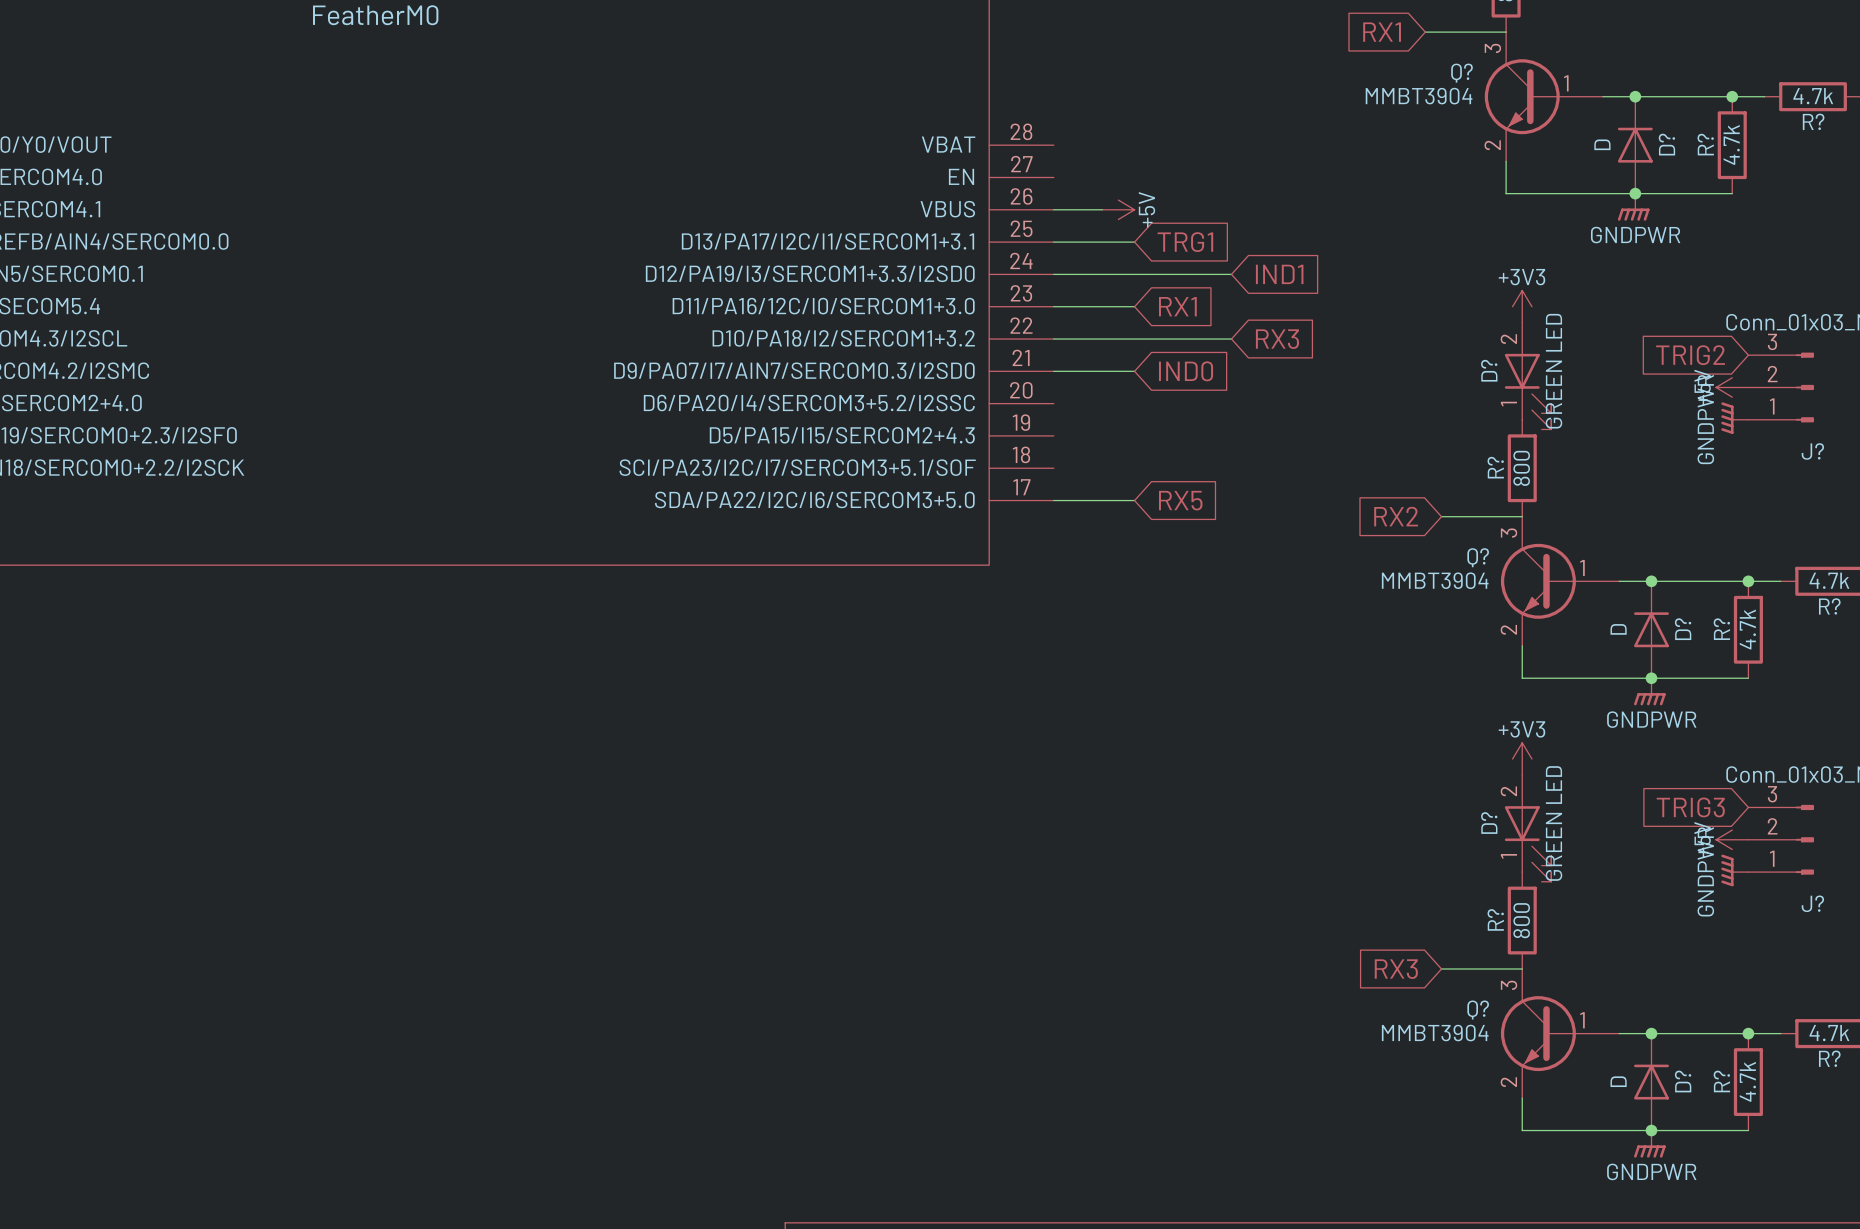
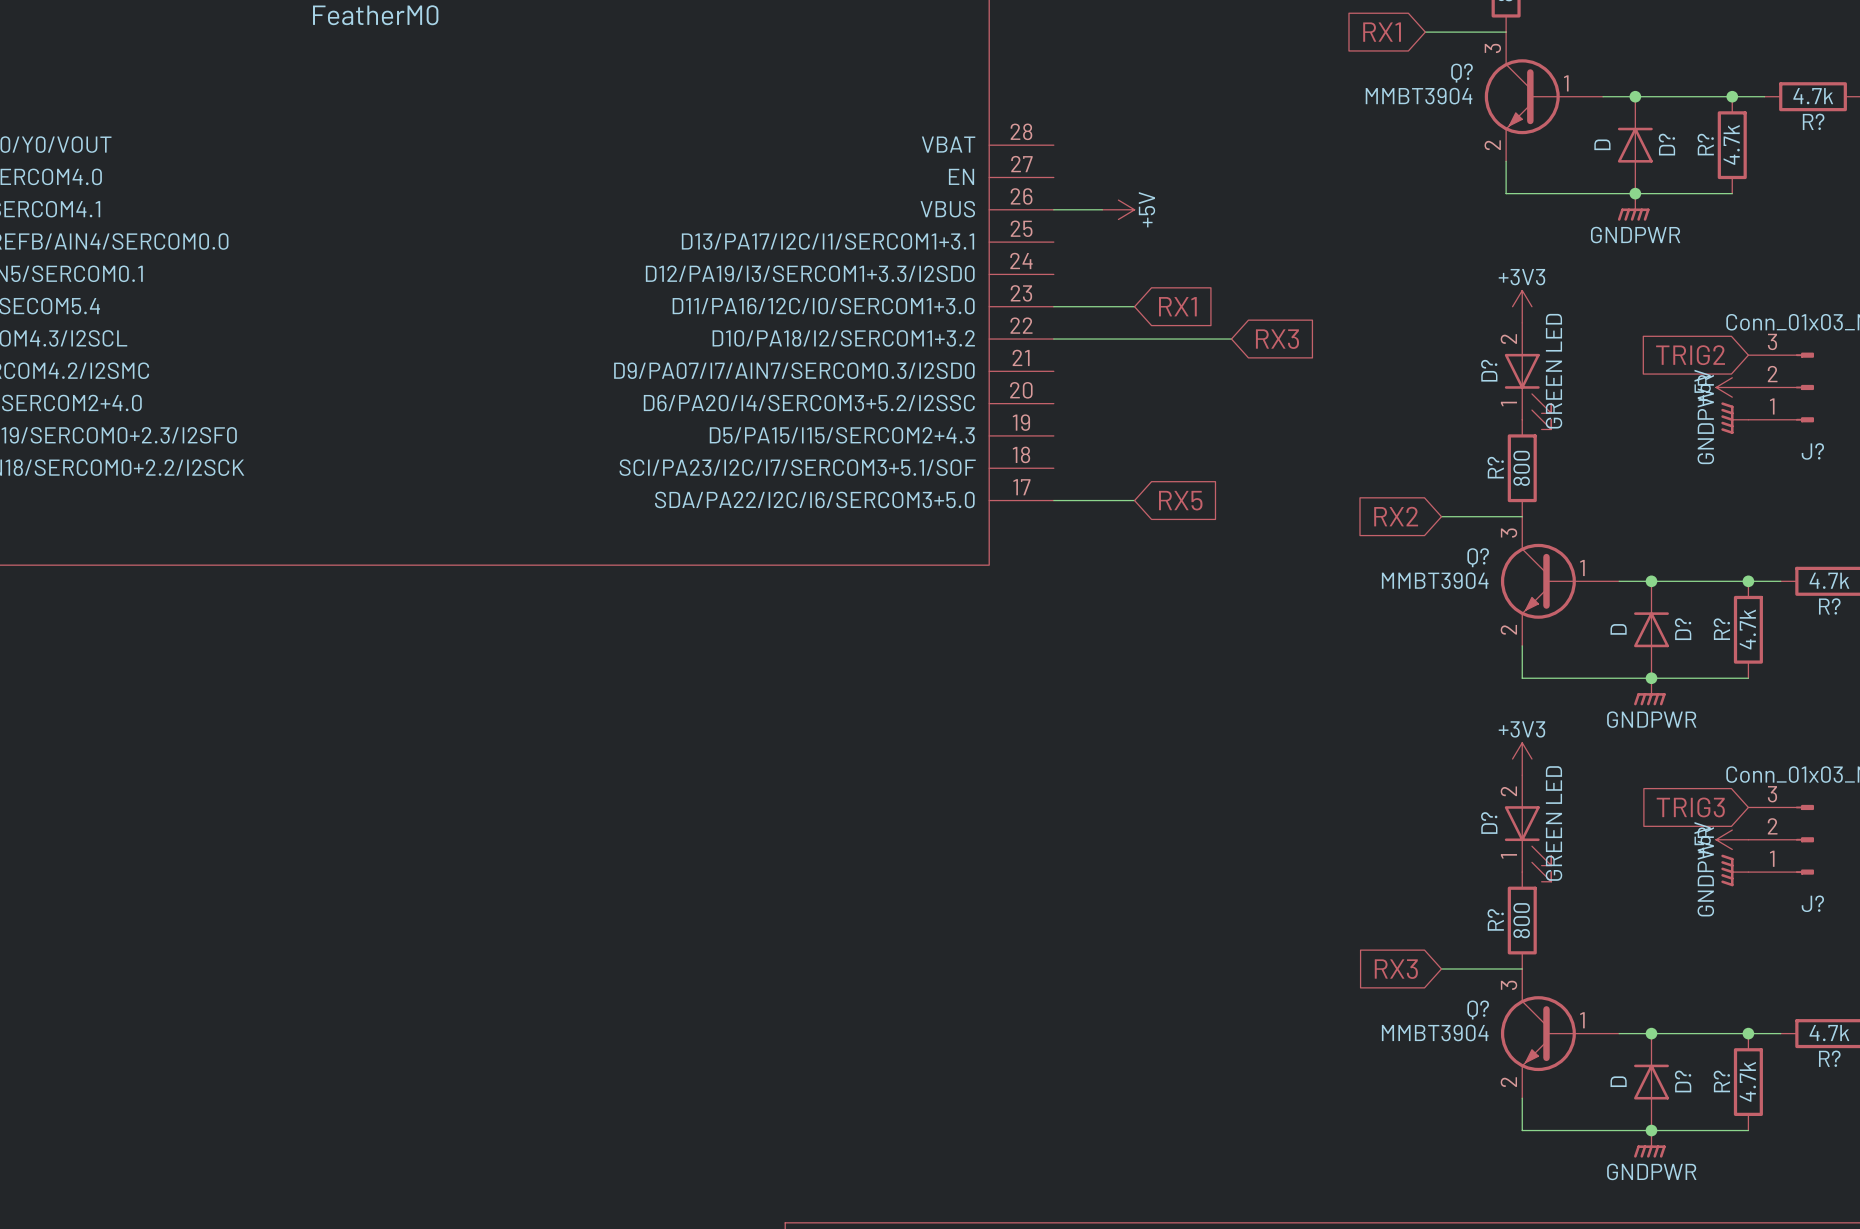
wire: (1053, 242) (1134, 242) -> none
global label: TRG1 (1185, 242) -> none
wire: (1053, 274) (1231, 274) -> none
global label: IND1 (1279, 274) -> none
wire: (1053, 371) (1134, 371) -> none
global label: IND0 (1186, 371) -> none

